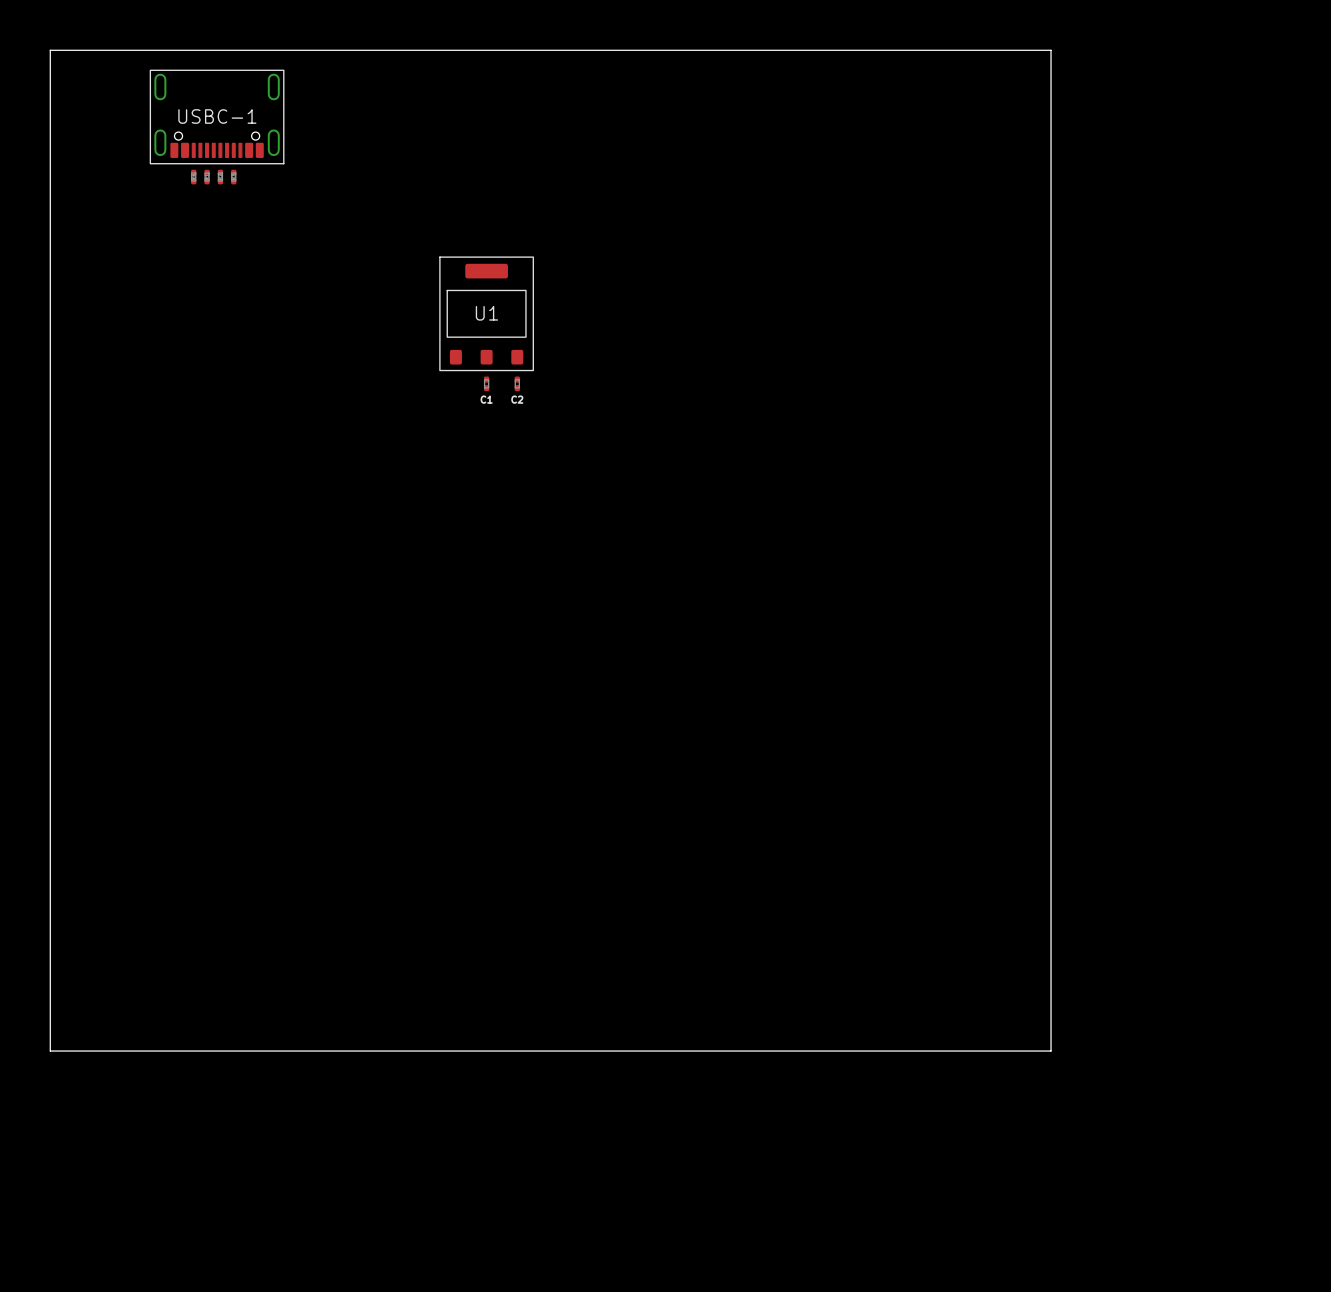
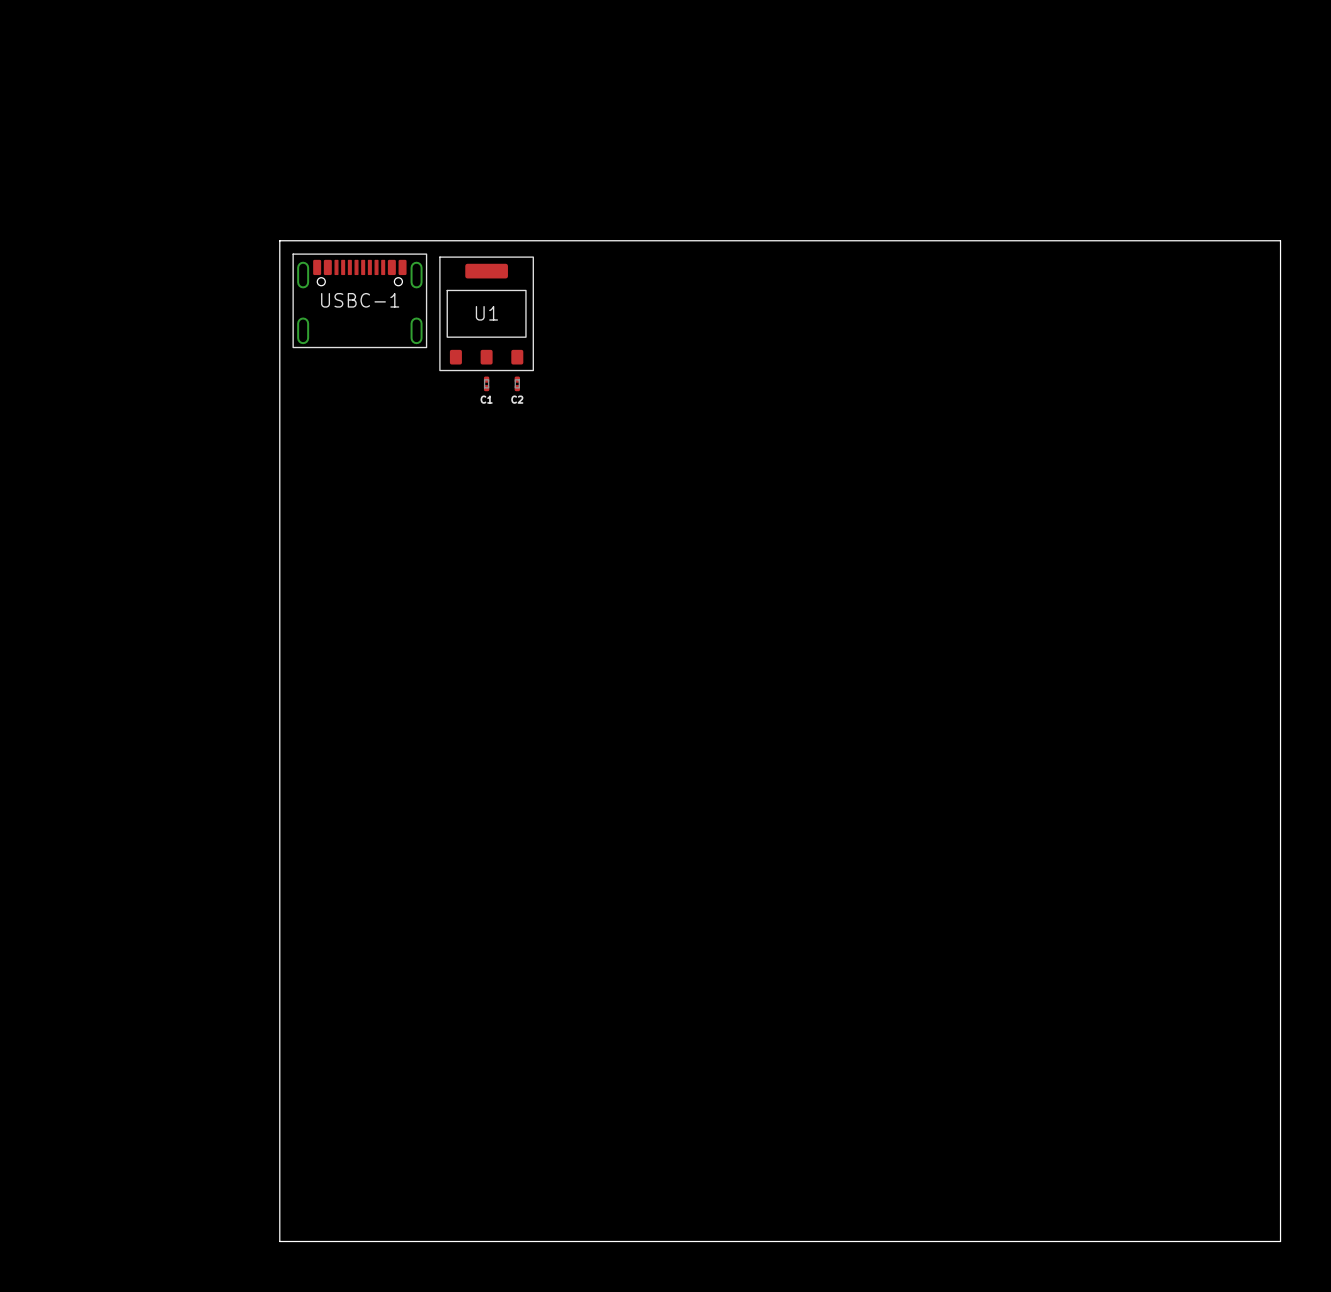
board edge: (50, 50) (1051, 50) (1051, 1051) (50, 1051) (50, 50) -> (279, 240) (1280, 240) (1280, 1241) (279, 1241) (279, 240)
USBC-1 rotation: 0° (217, 117) -> 180° (359, 300)
USBC-1 position: (217, 117) -> (359, 300)
part: (193, 177) -> none
part: (207, 177) -> none
part: (220, 177) -> none
part: (233, 177) -> none

